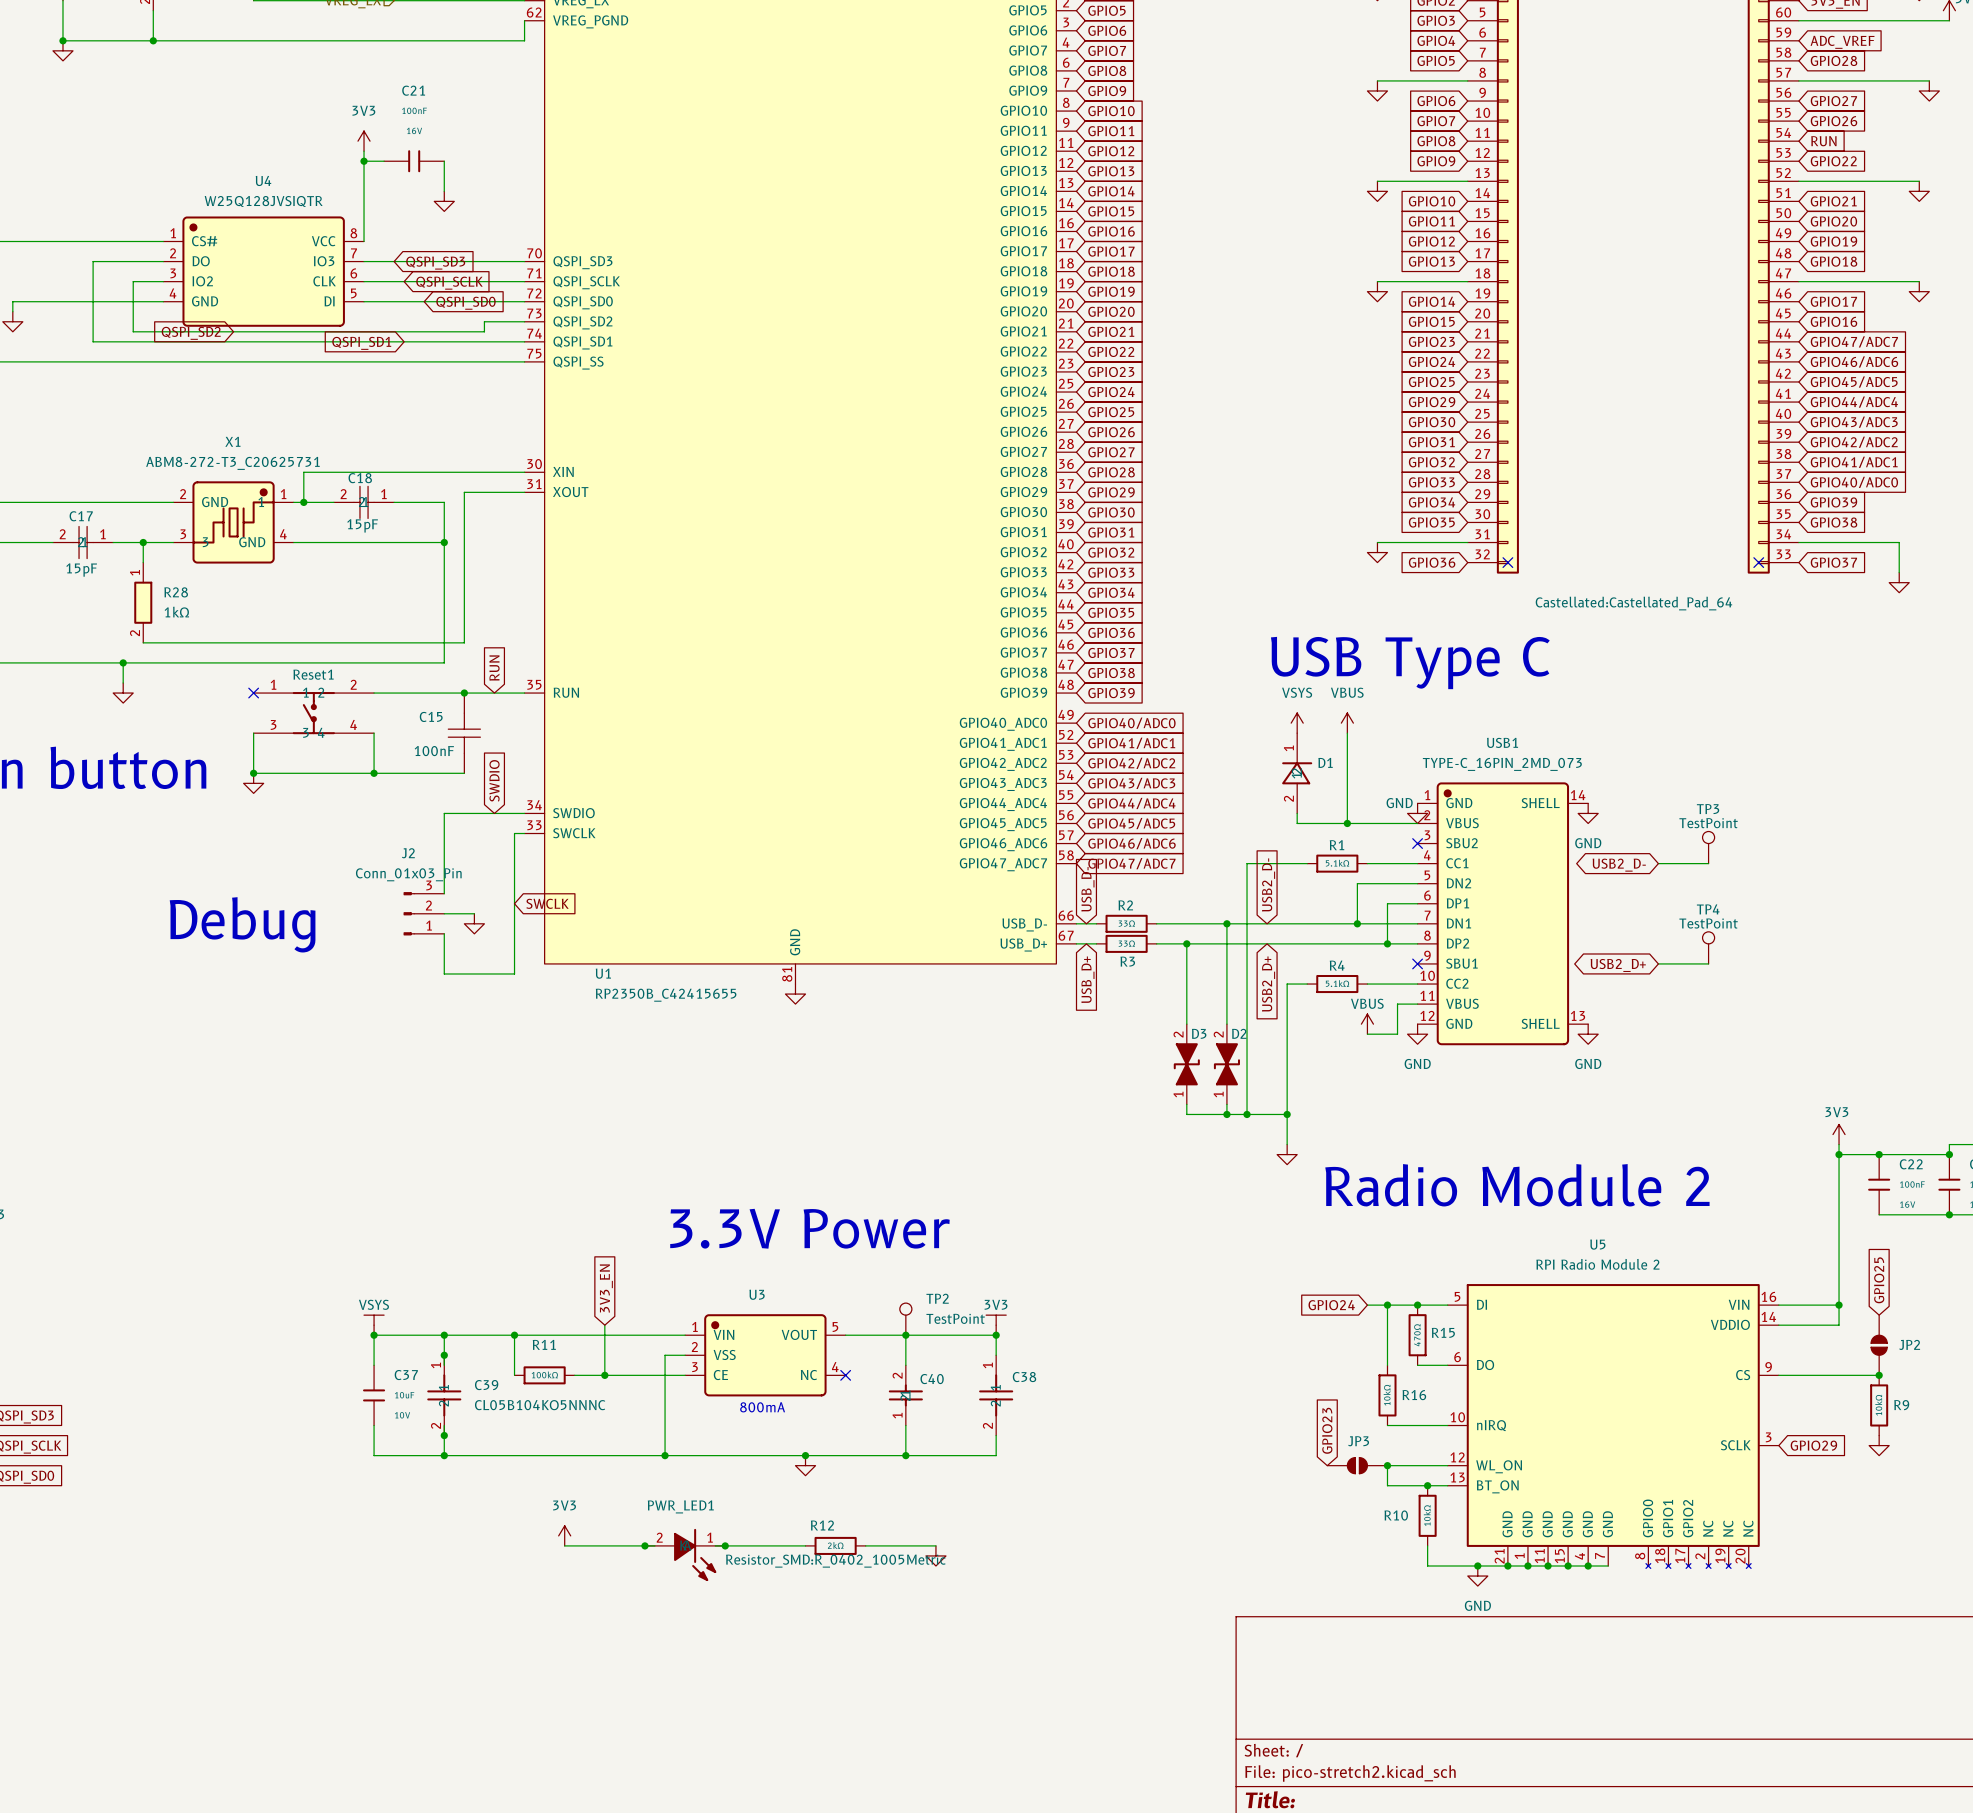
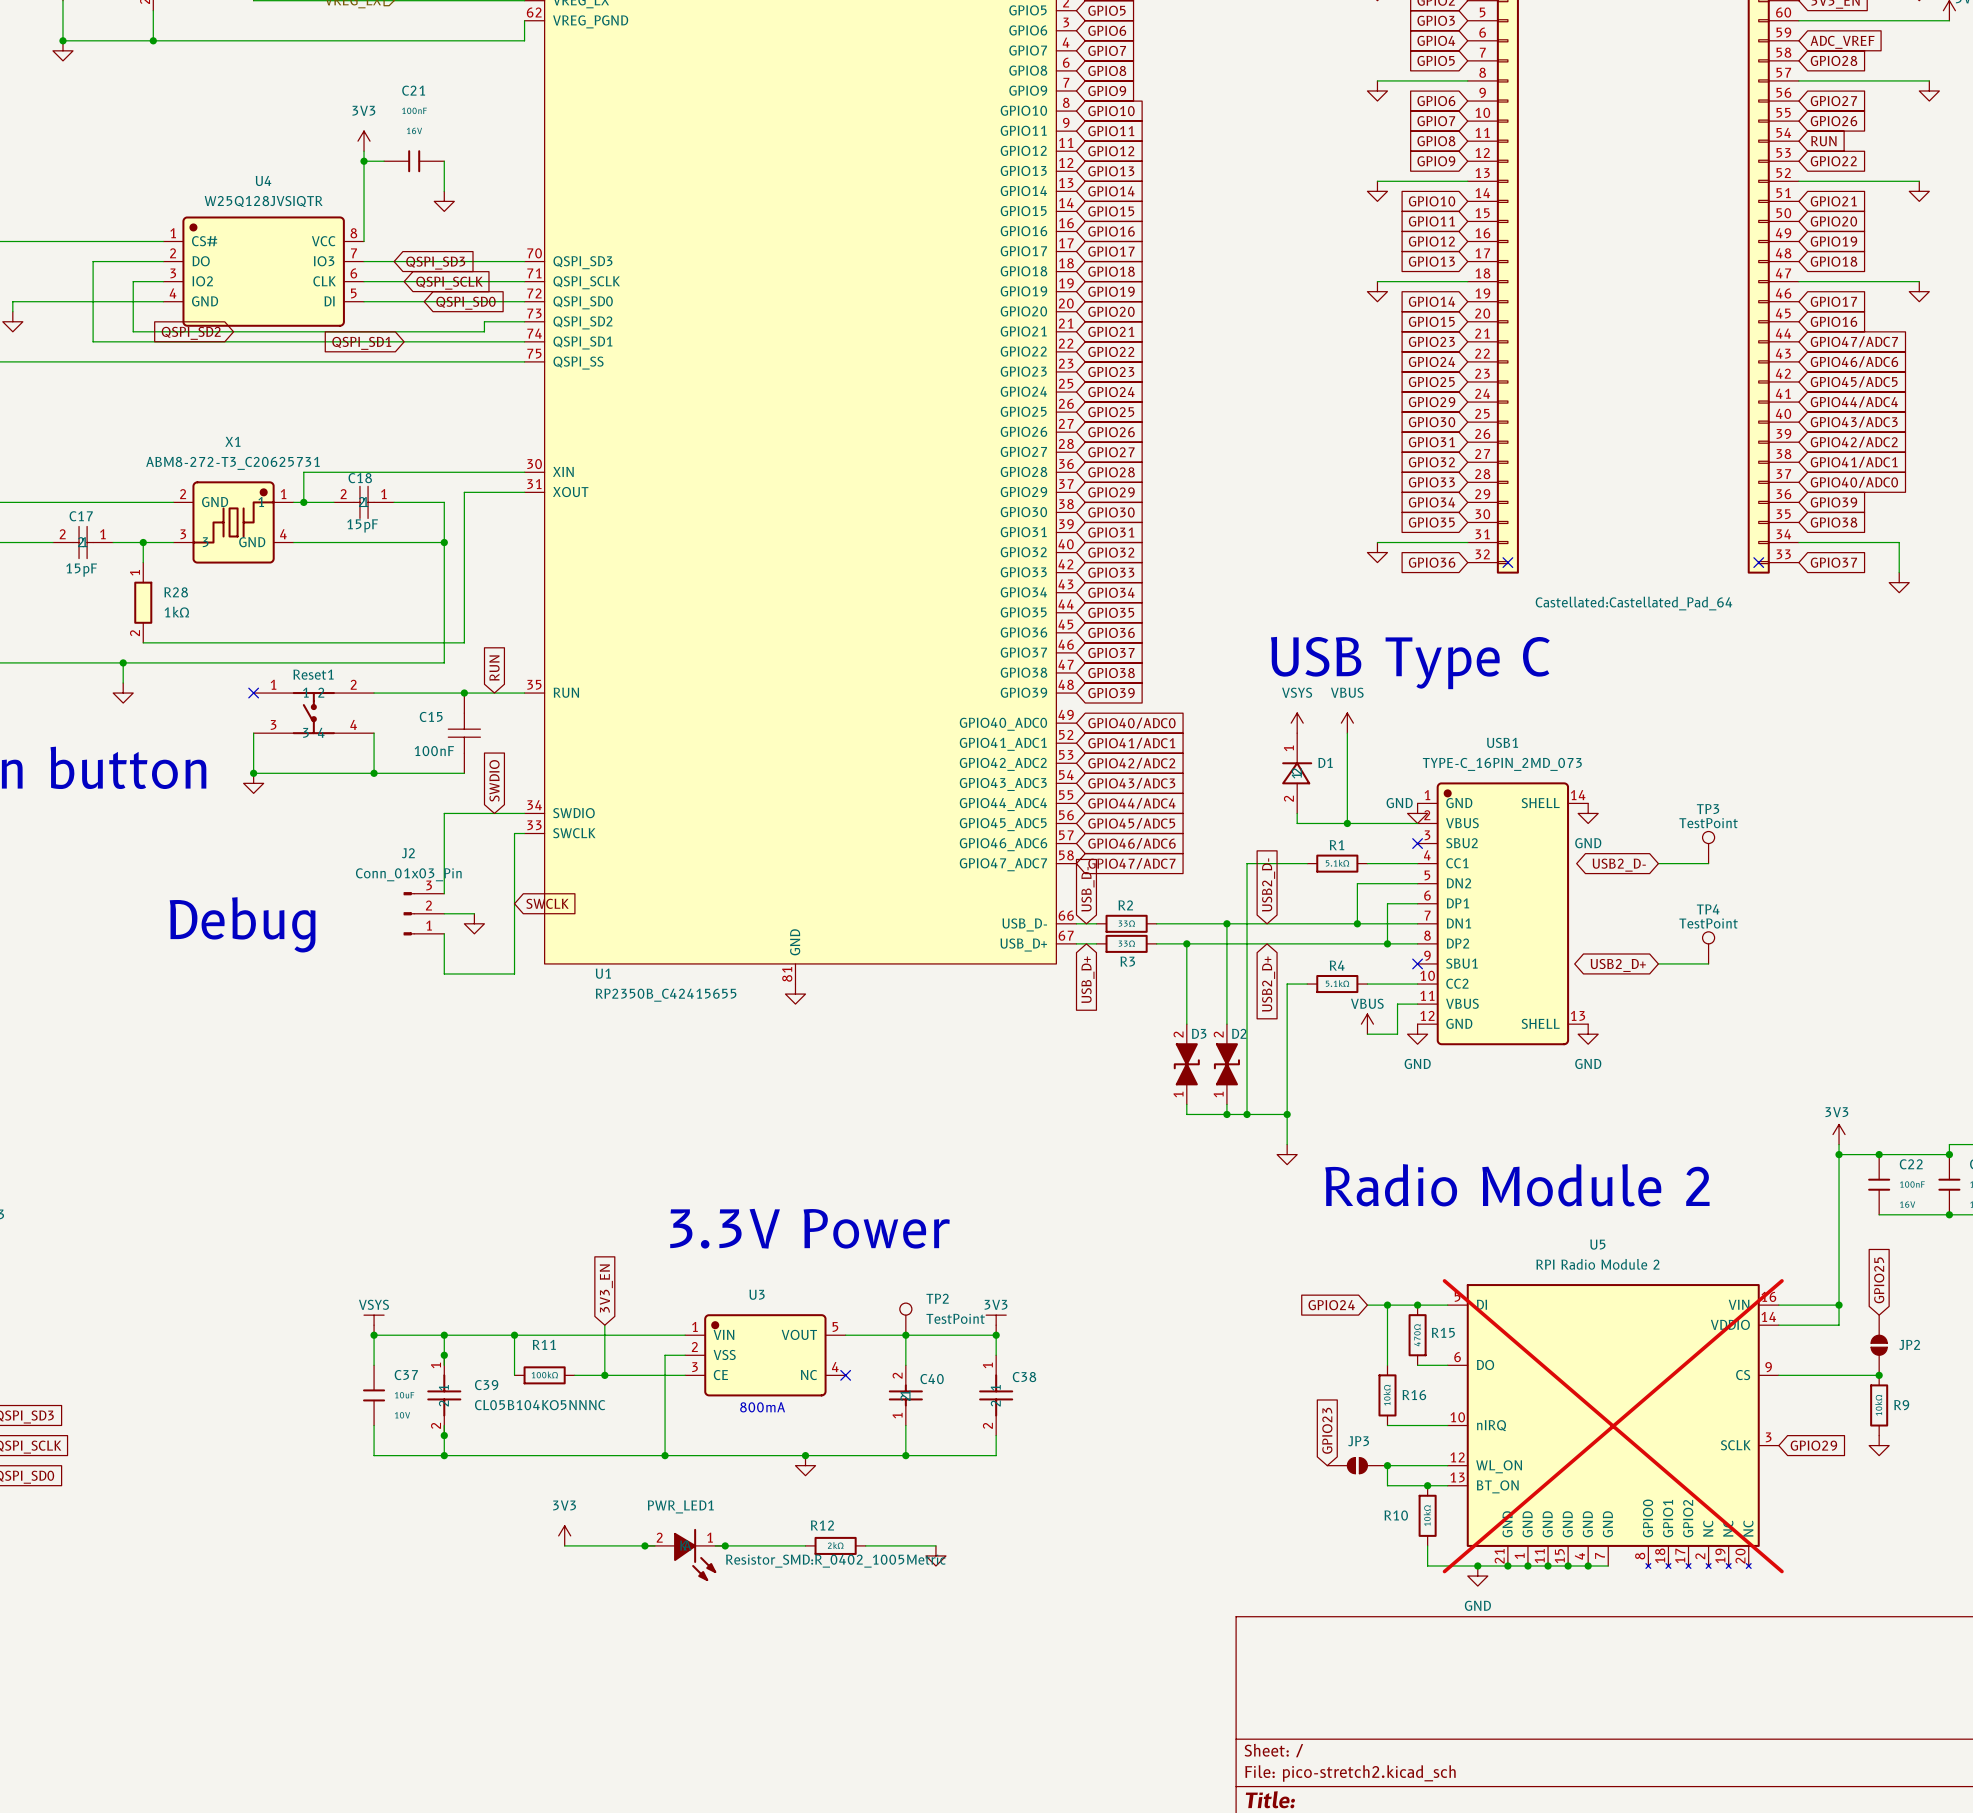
U5 do-not-place cross: none -> (1613, 1426)

